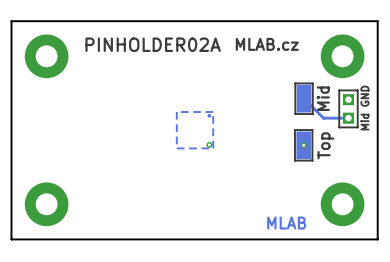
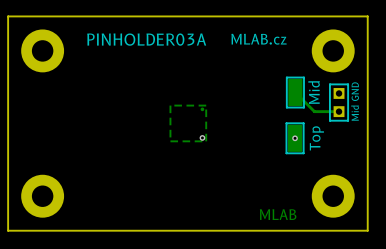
text: PINHOLDER02A (153, 44) -> PINHOLDER03A (146, 39)

